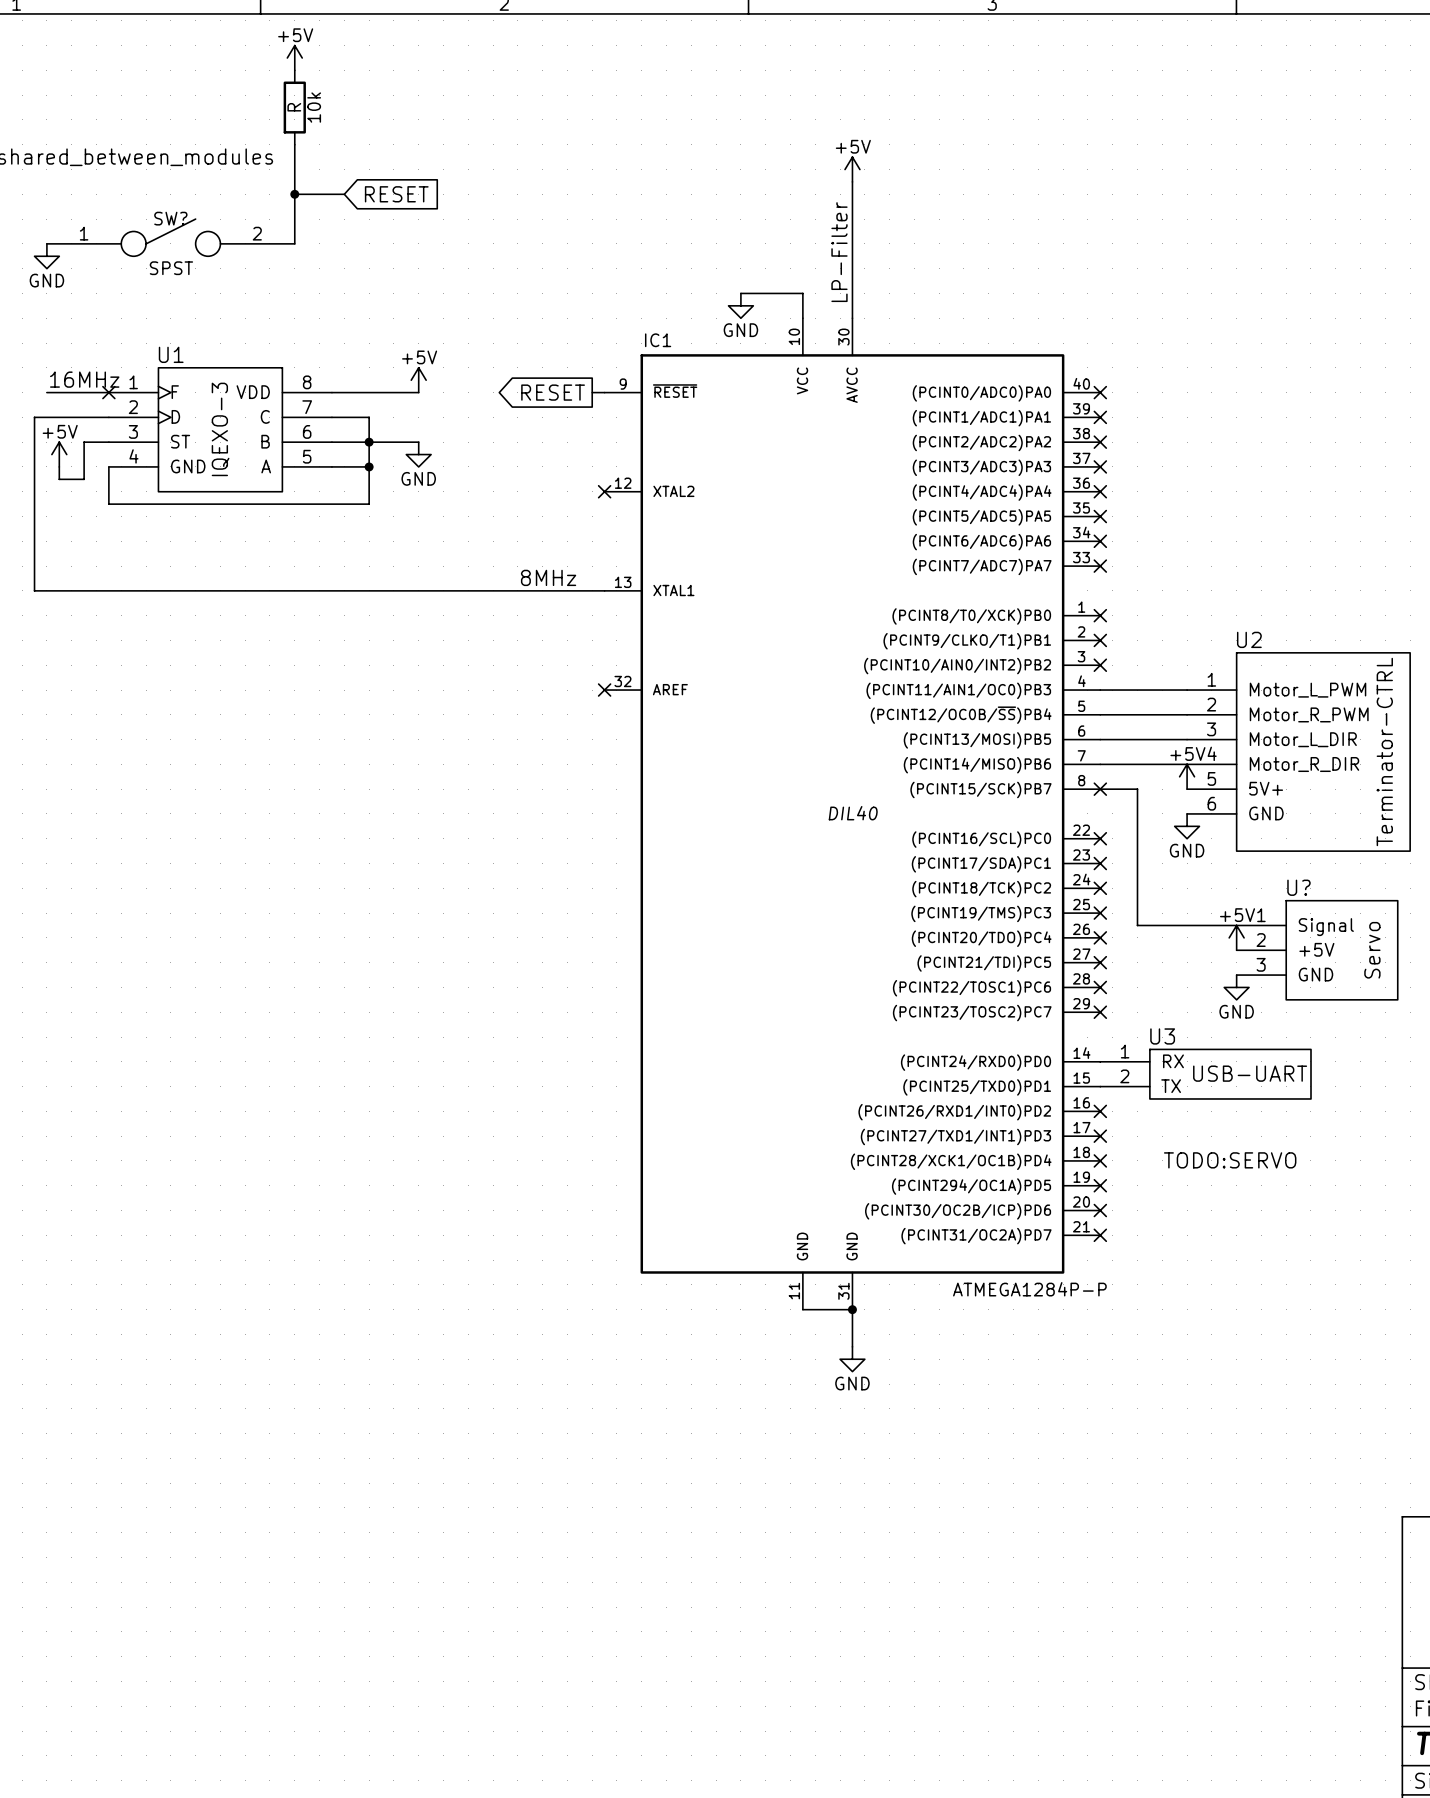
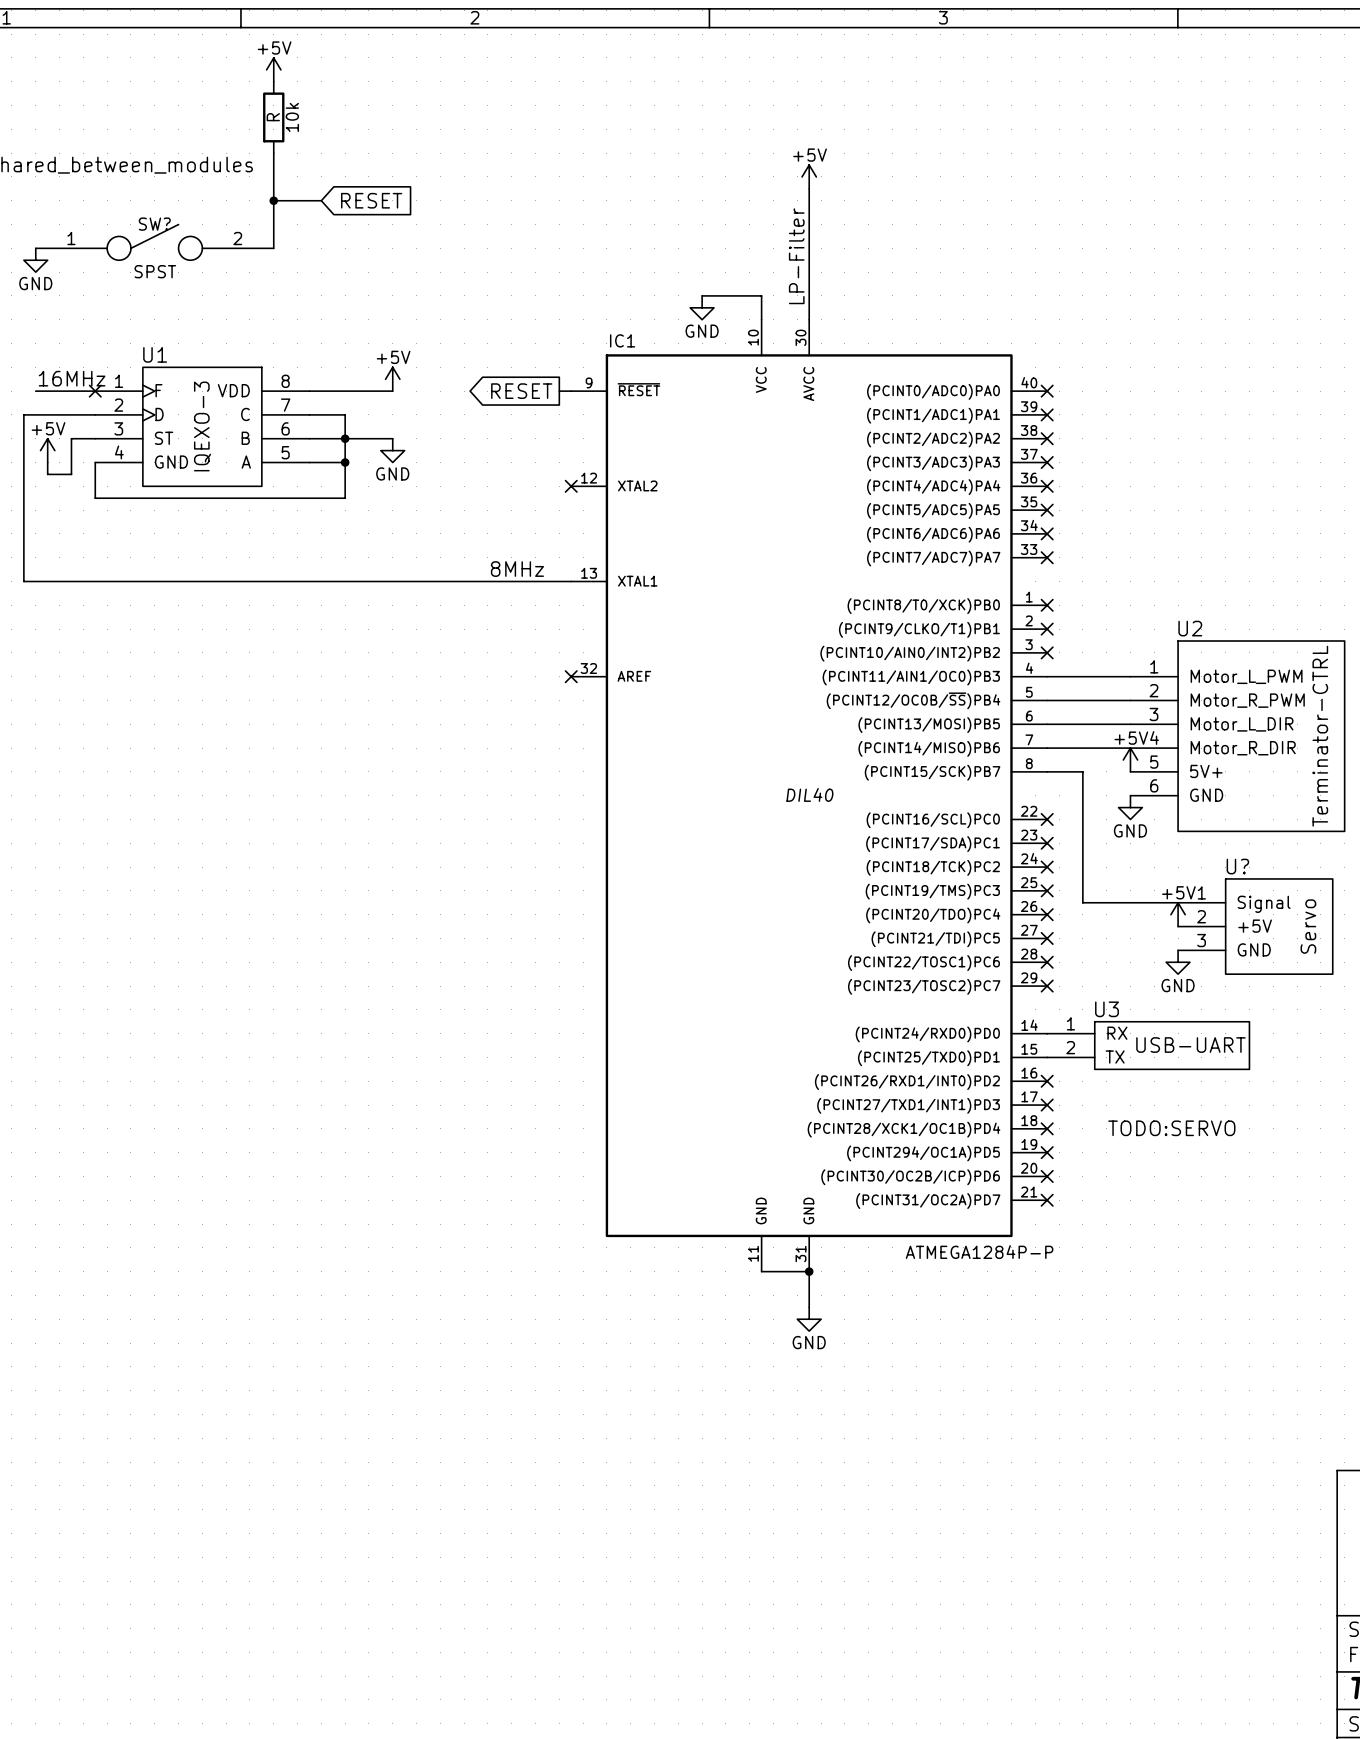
no-connect mark: (1100, 789) -> none

